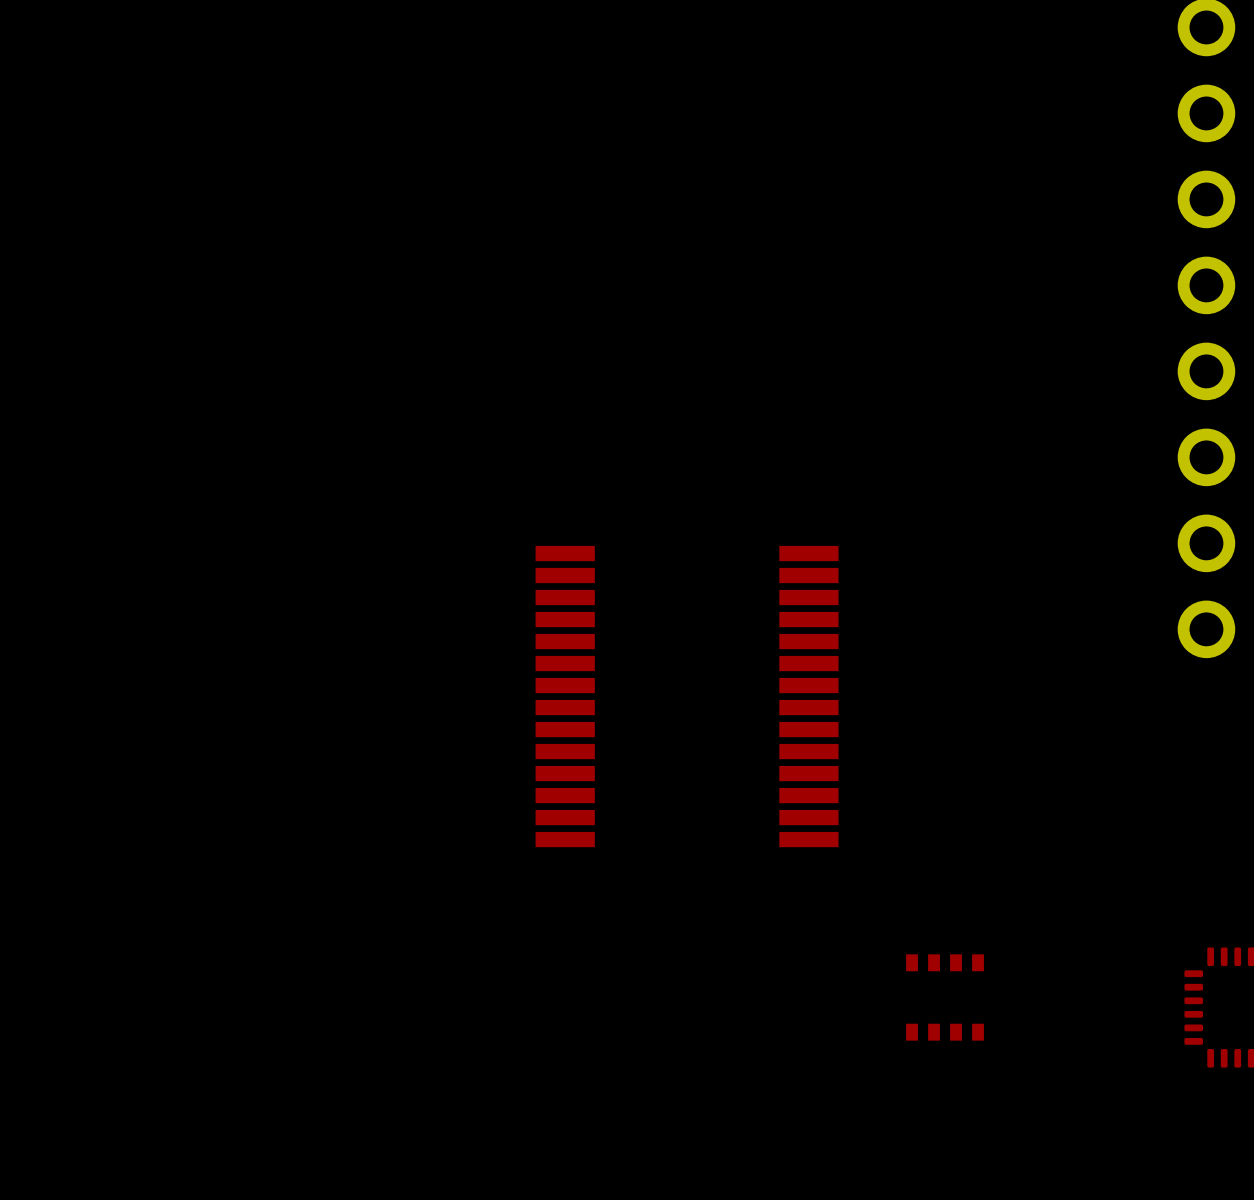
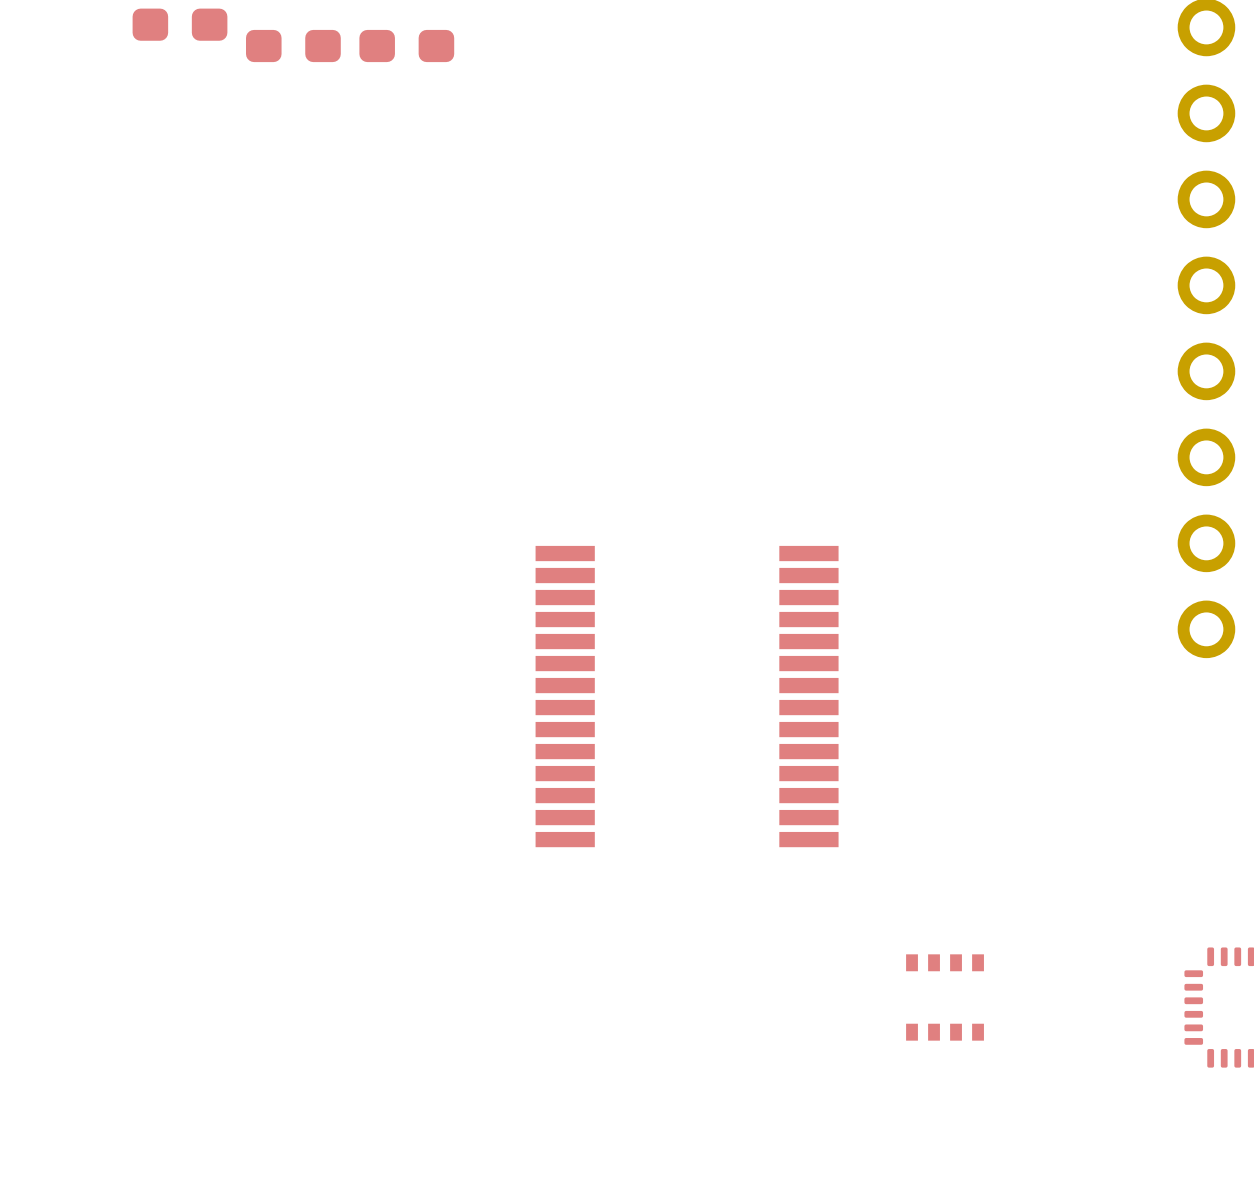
part: none -> (179, 24)
part: none -> (293, 46)
part: none -> (406, 46)

